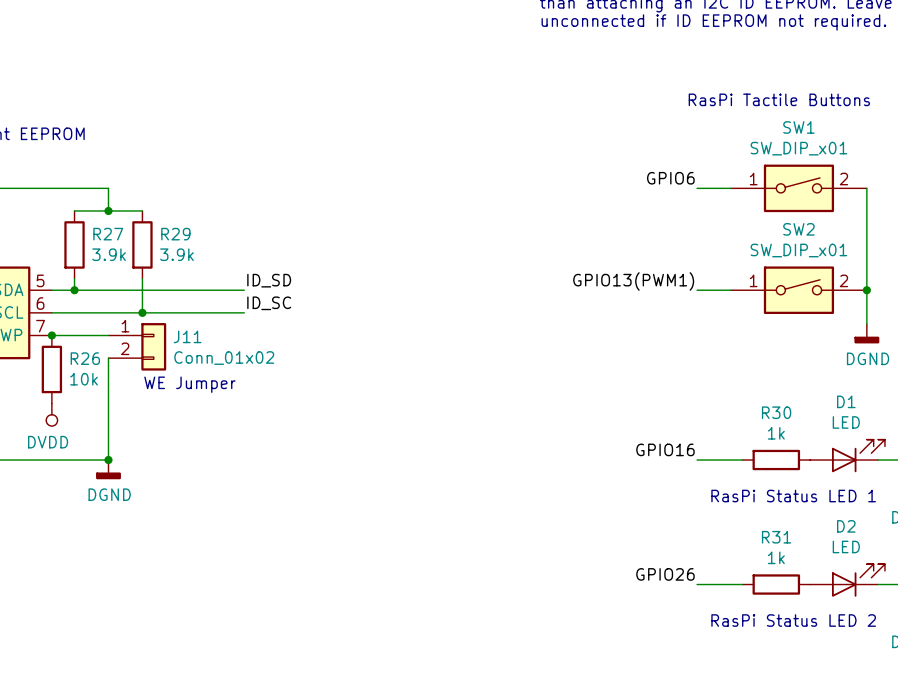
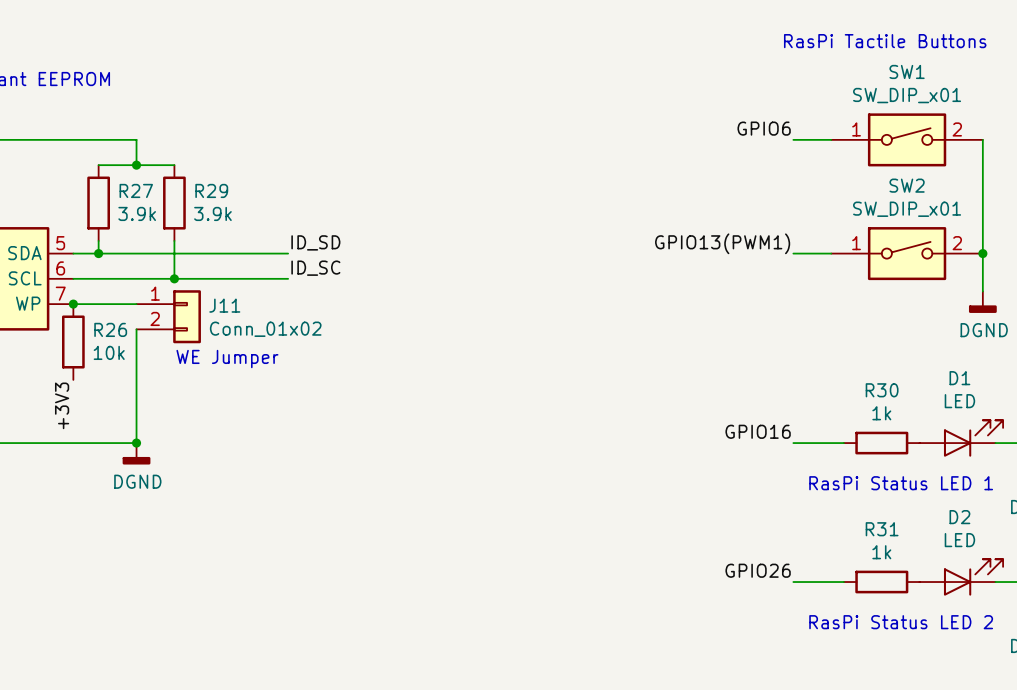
power symbol: DVDD (51, 414) -> none
label: none -> +3V3 (62, 405)

